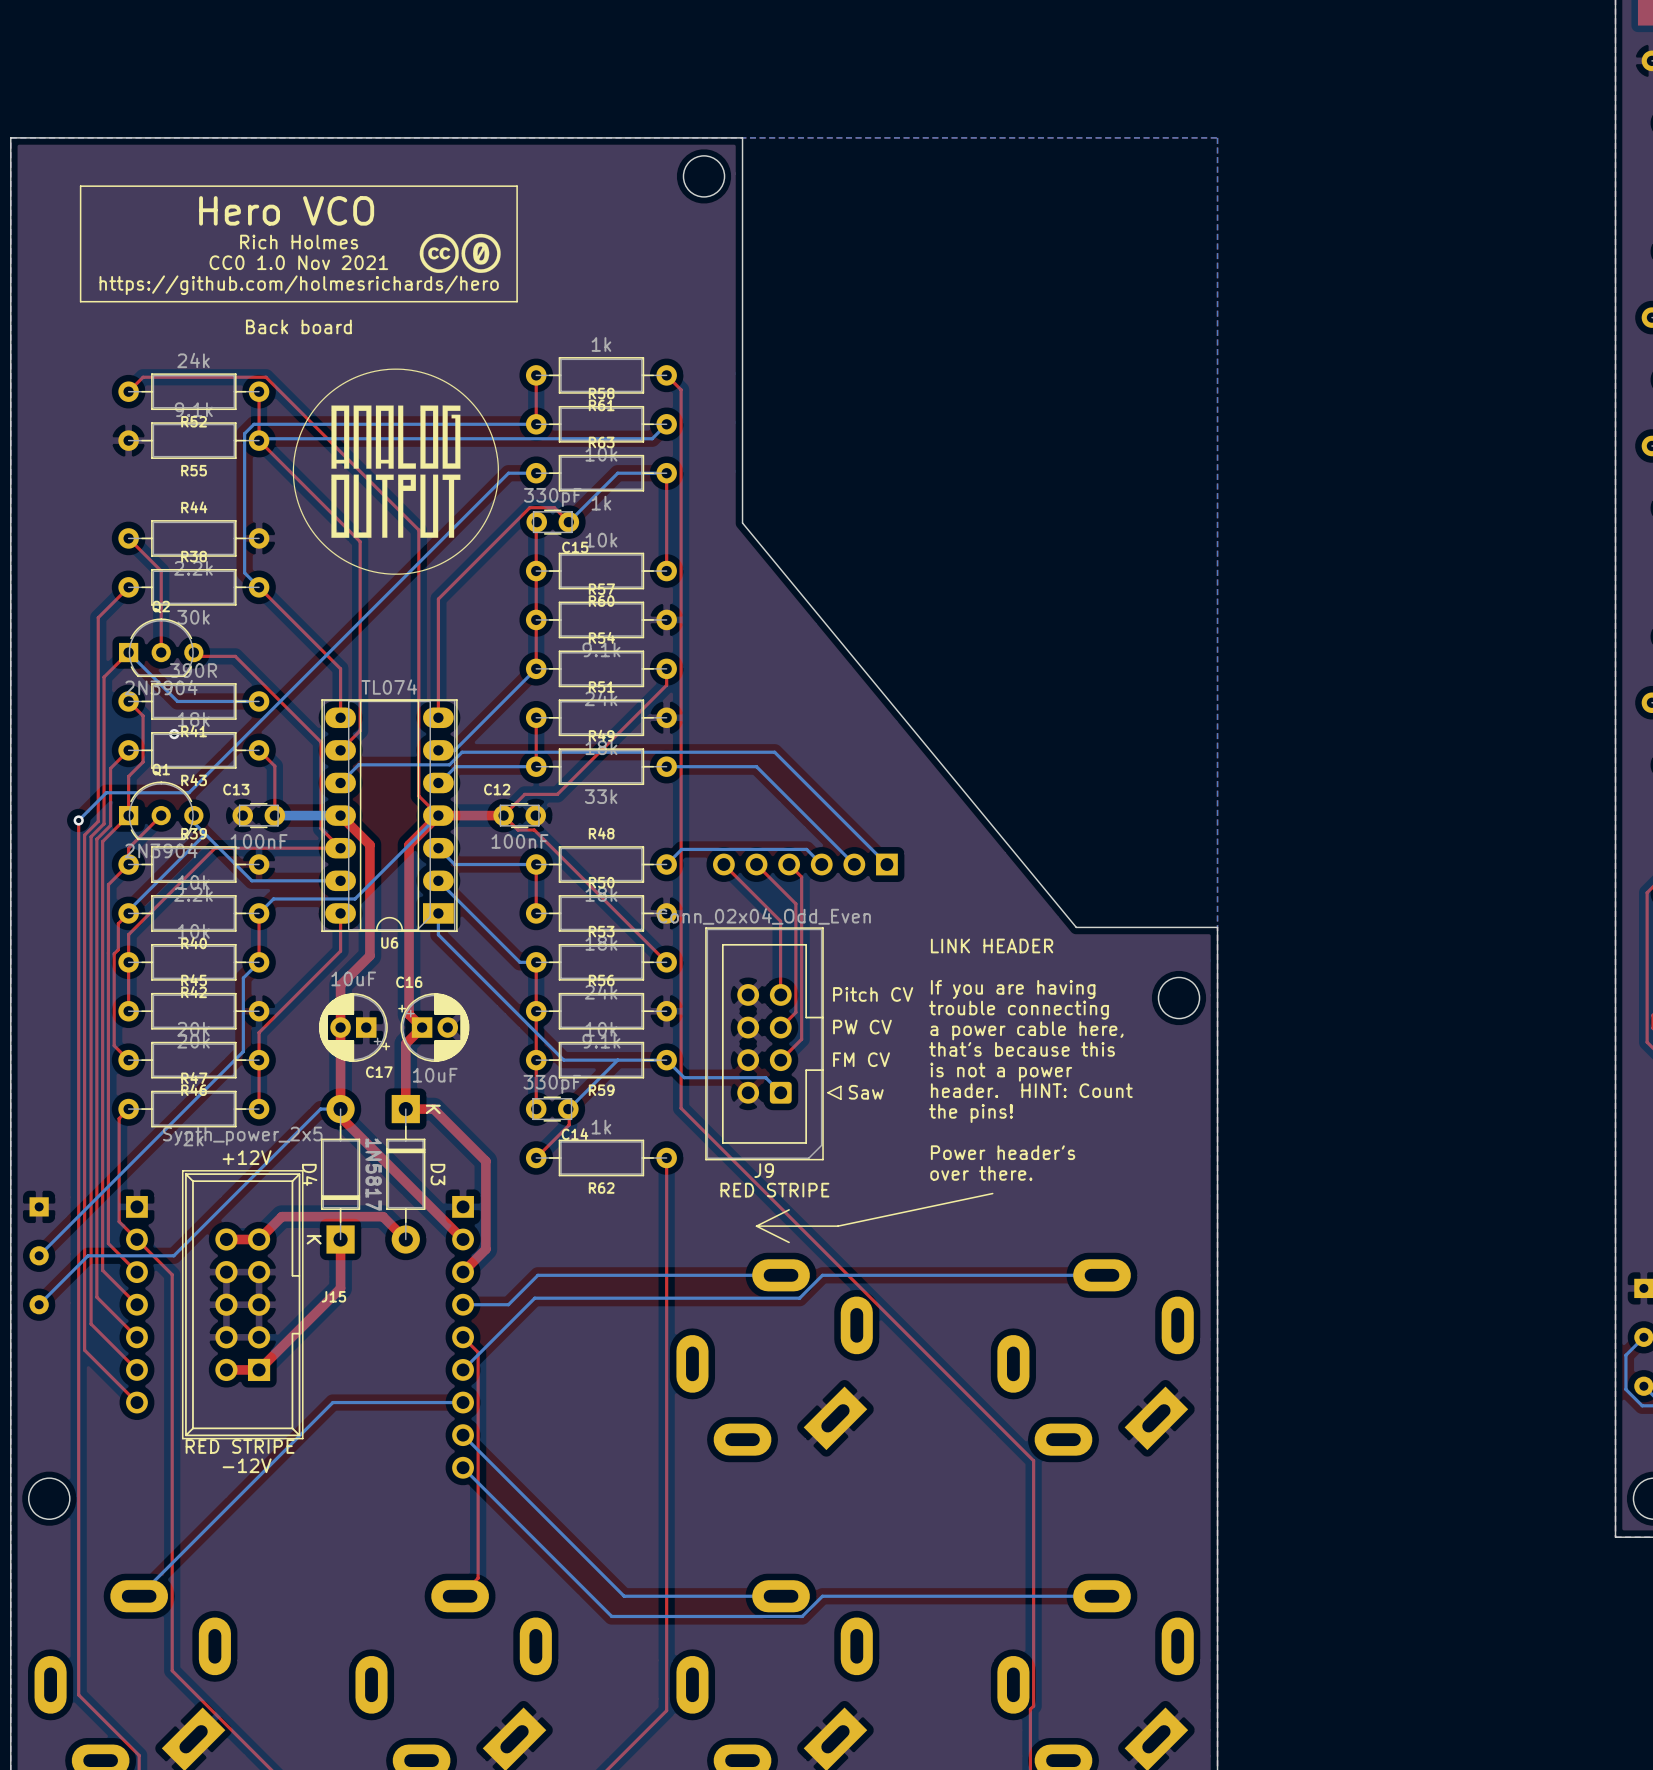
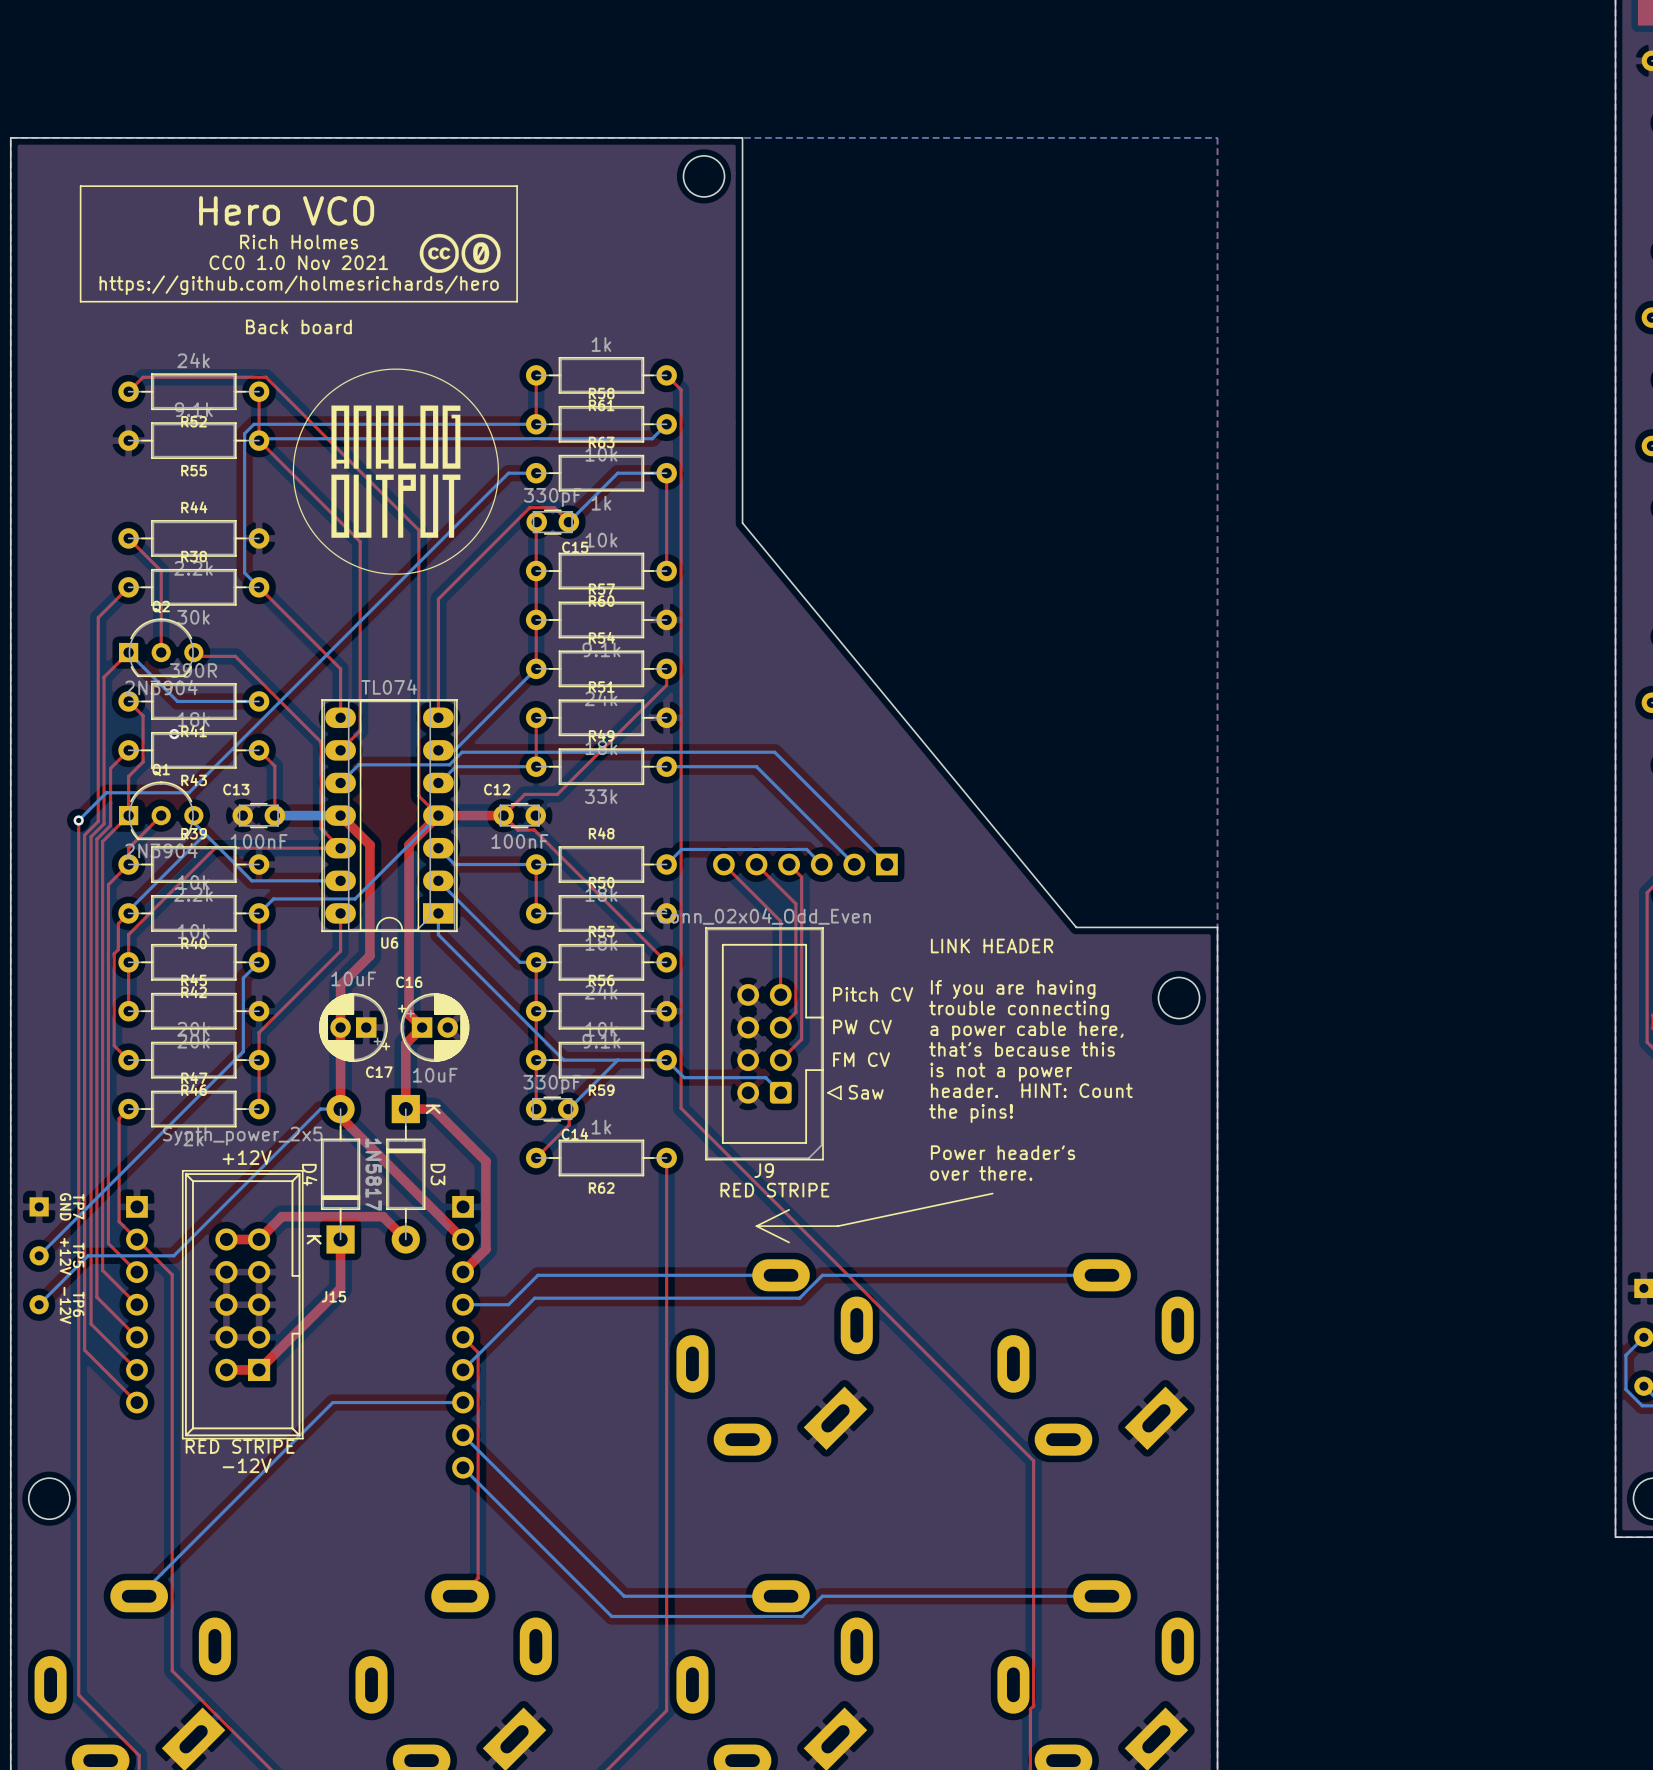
TP7 value: none -> GND (65, 1206)
TP7 name: none -> TP7 (78, 1206)
TP5 name: none -> TP5 (78, 1255)
TP5 value: none -> +12V (65, 1256)
TP6 name: none -> TP6 (78, 1304)
TP6 value: none -> -12V (65, 1305)

